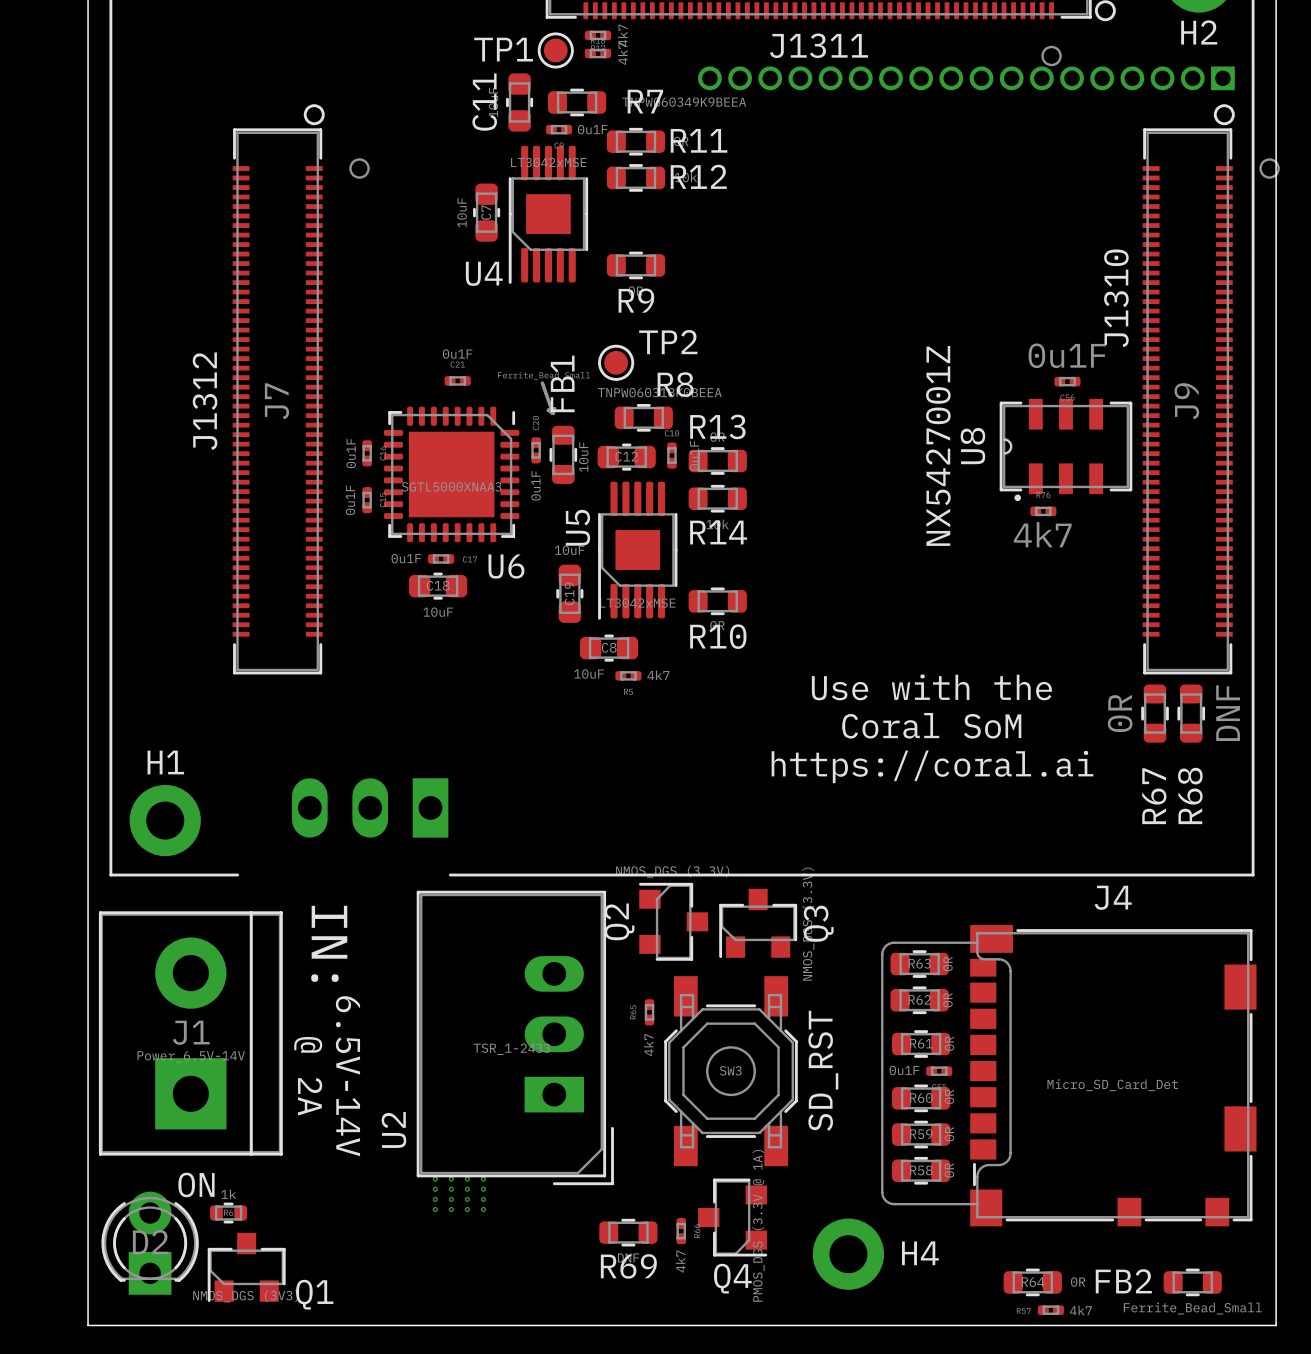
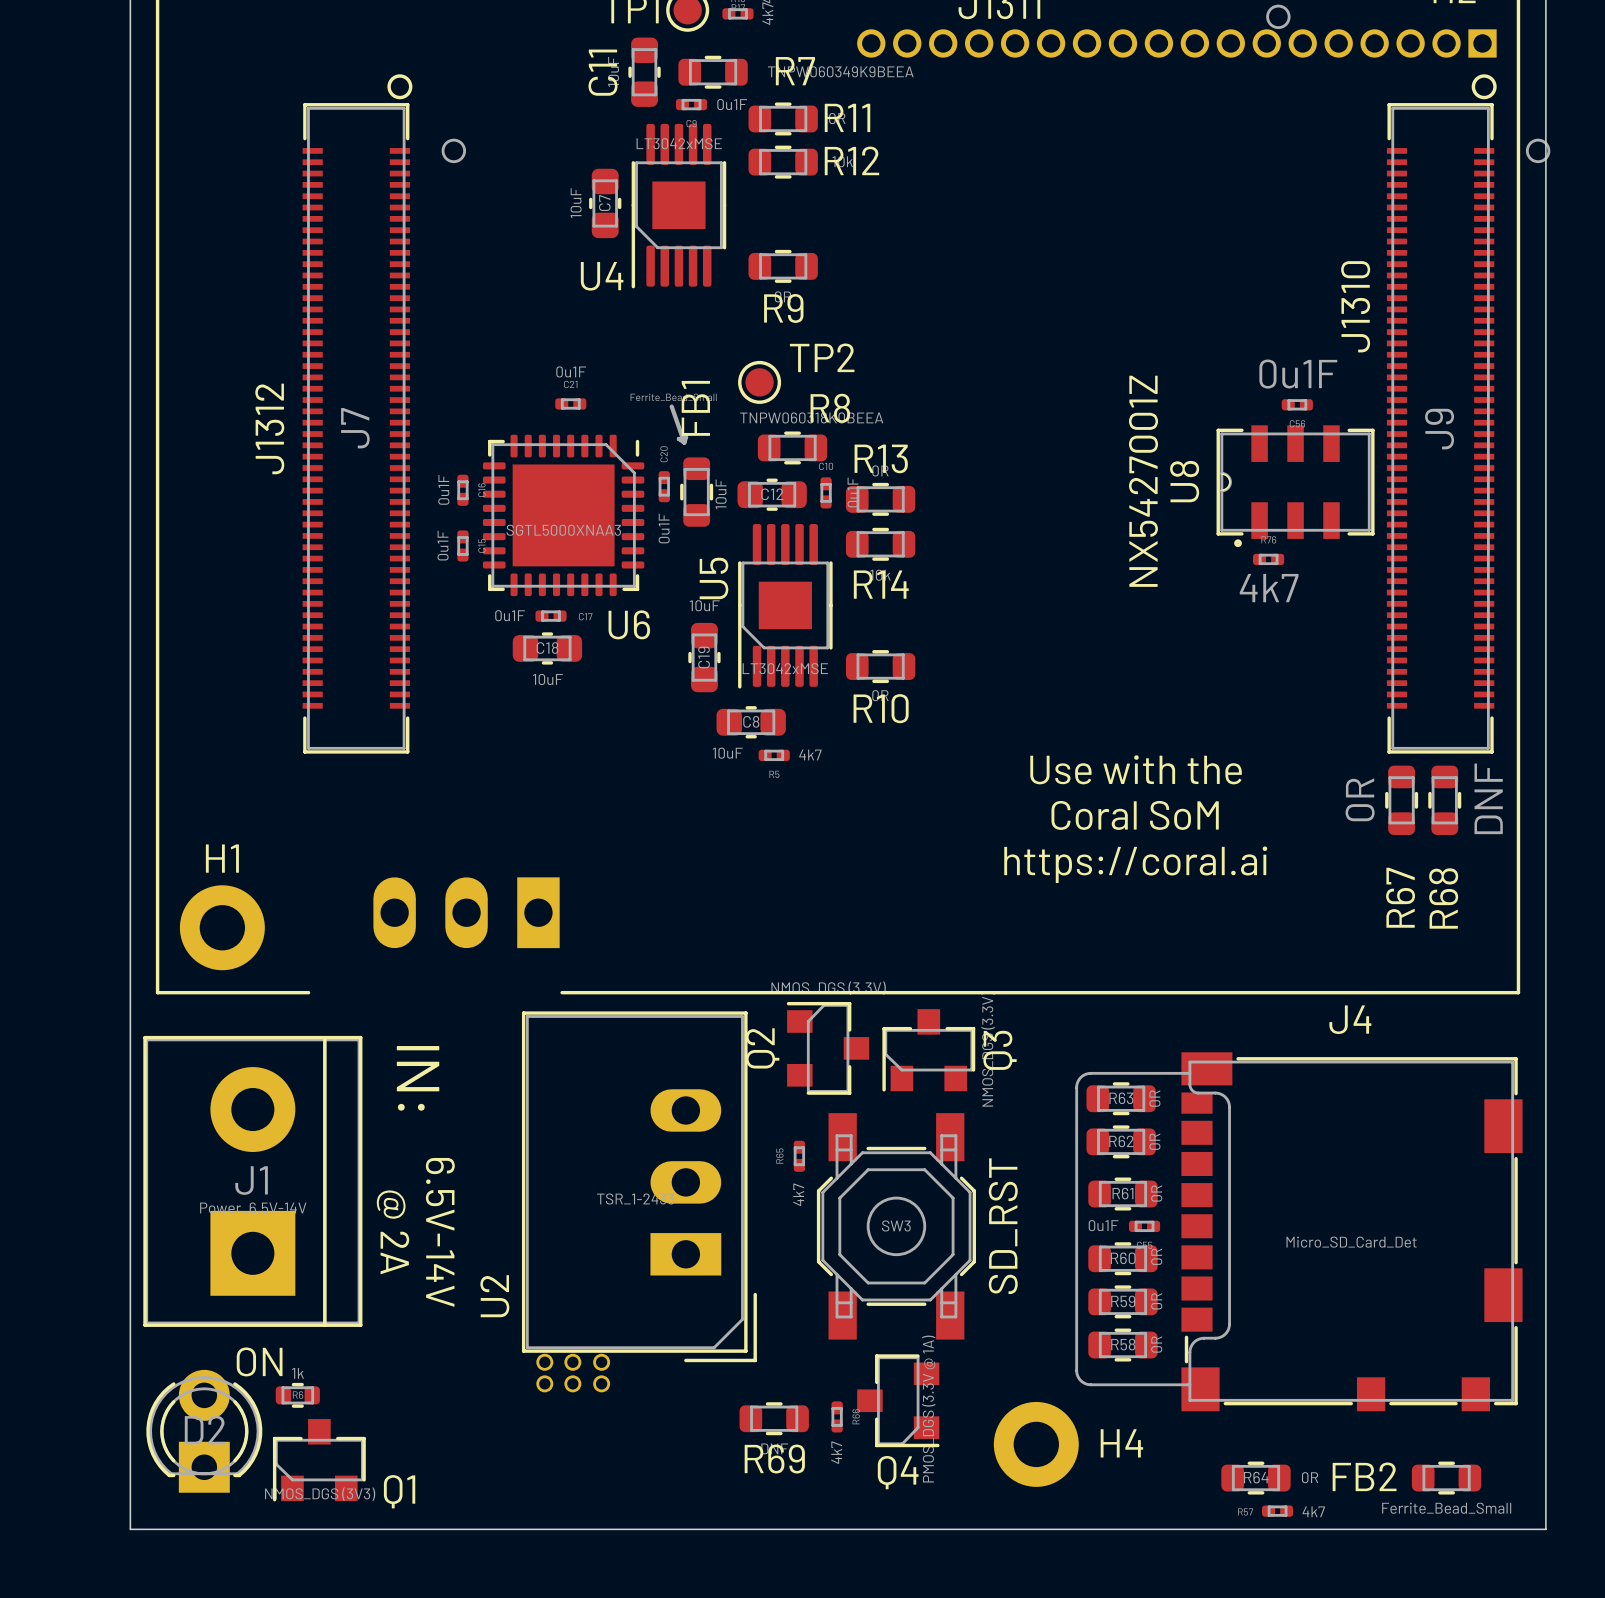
part footprint: [432, 1176, 487, 1213] -> [536, 1353, 611, 1393]

